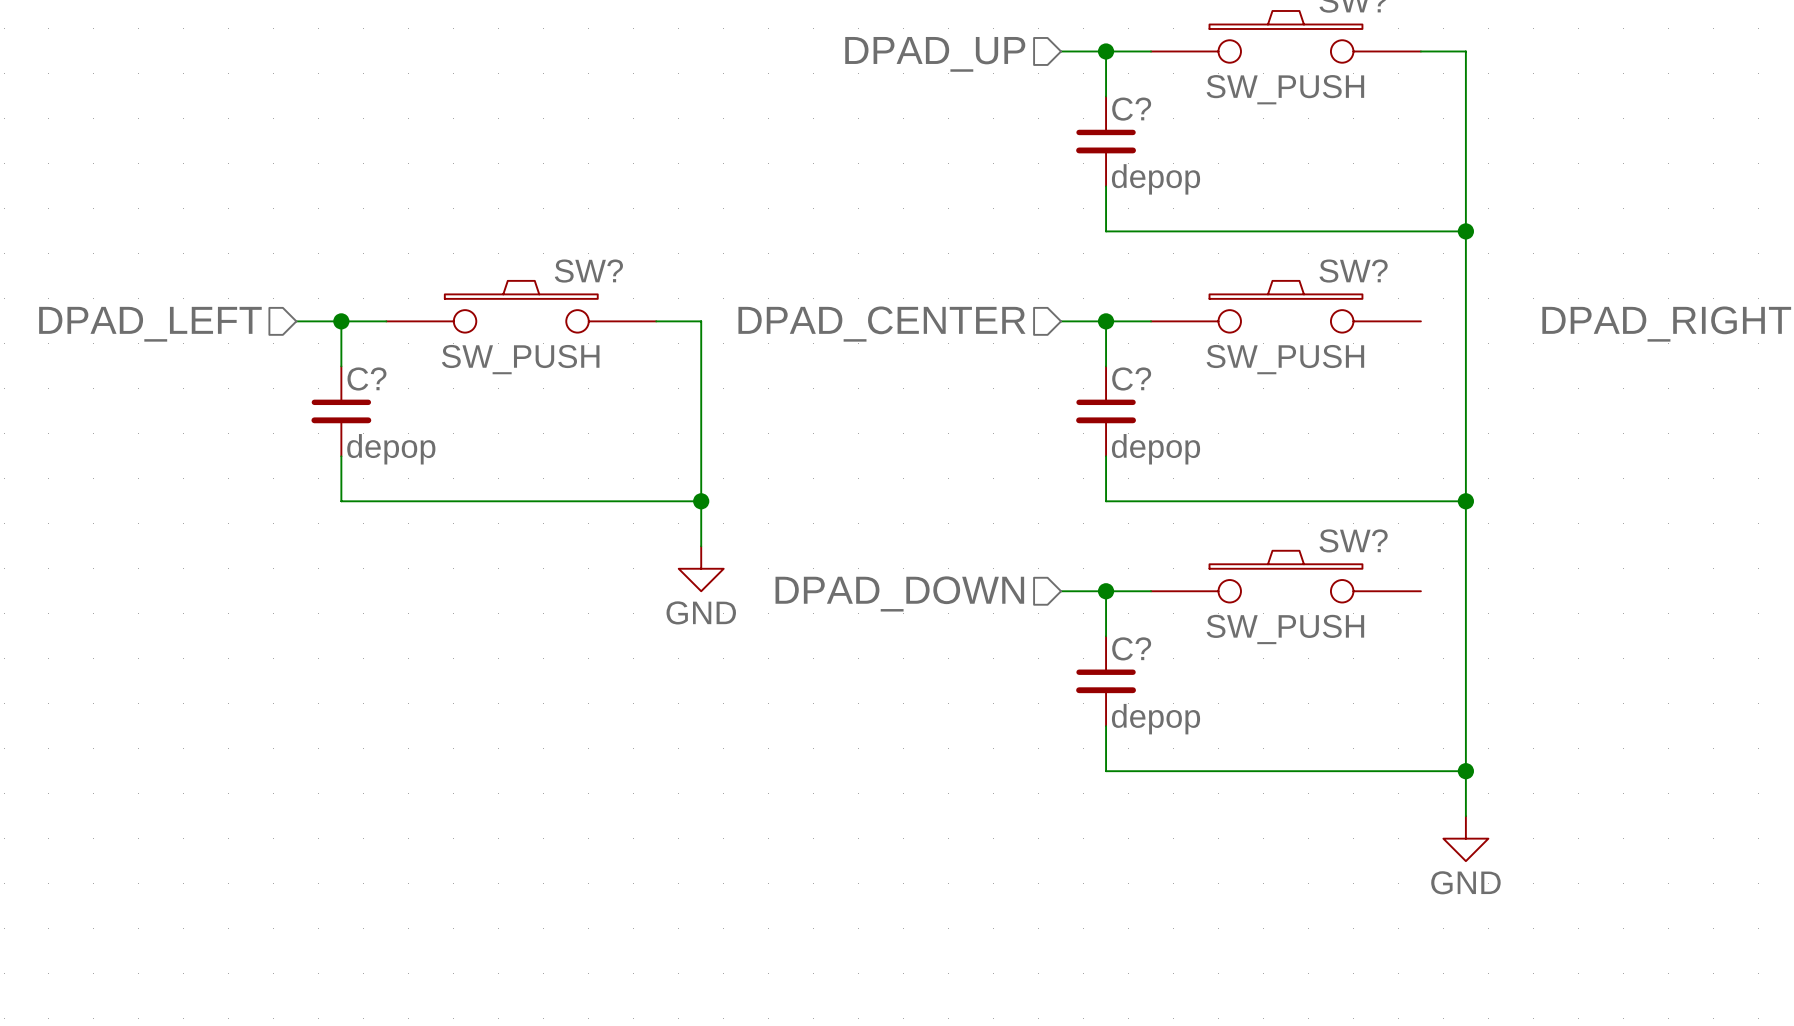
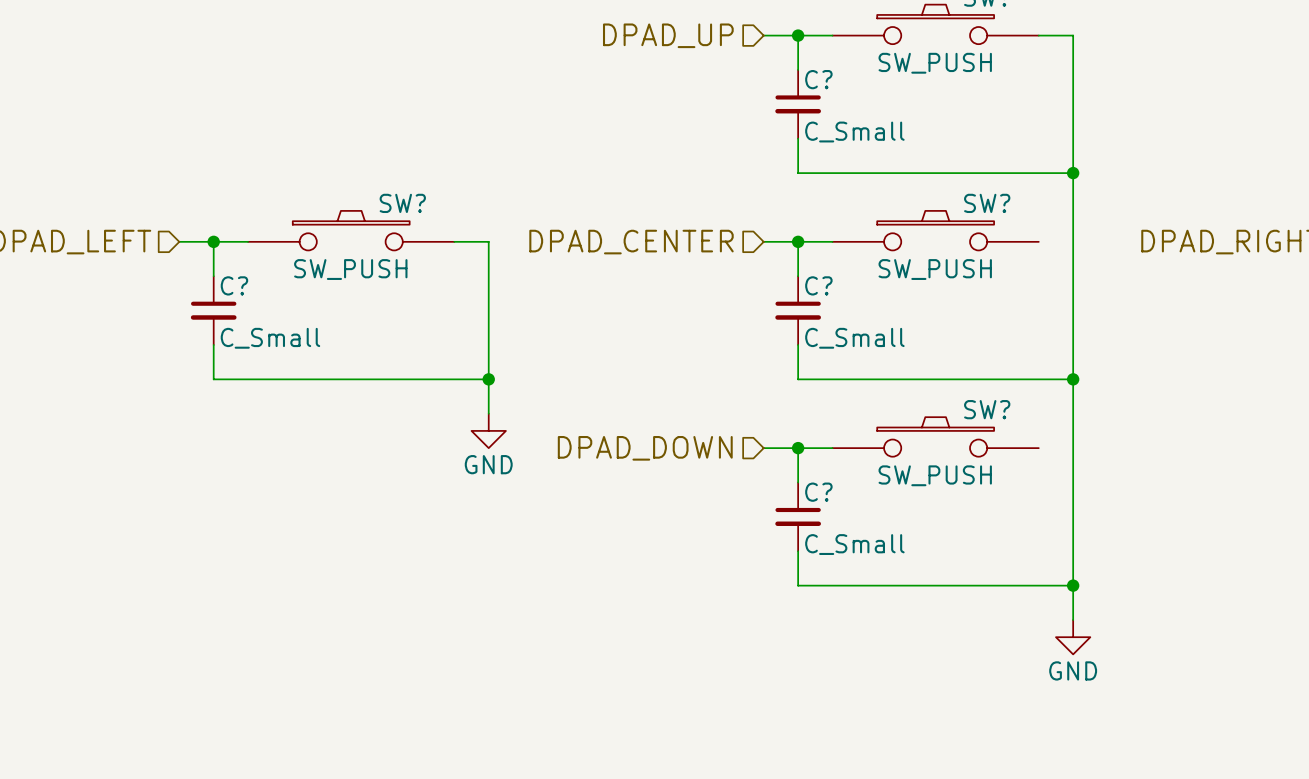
C? value: depop (1156, 179) -> C_Small (854, 132)
C? value: depop (391, 449) -> C_Small (270, 338)
C? value: depop (1156, 449) -> C_Small (854, 338)
C? value: depop (1156, 719) -> C_Small (854, 544)

